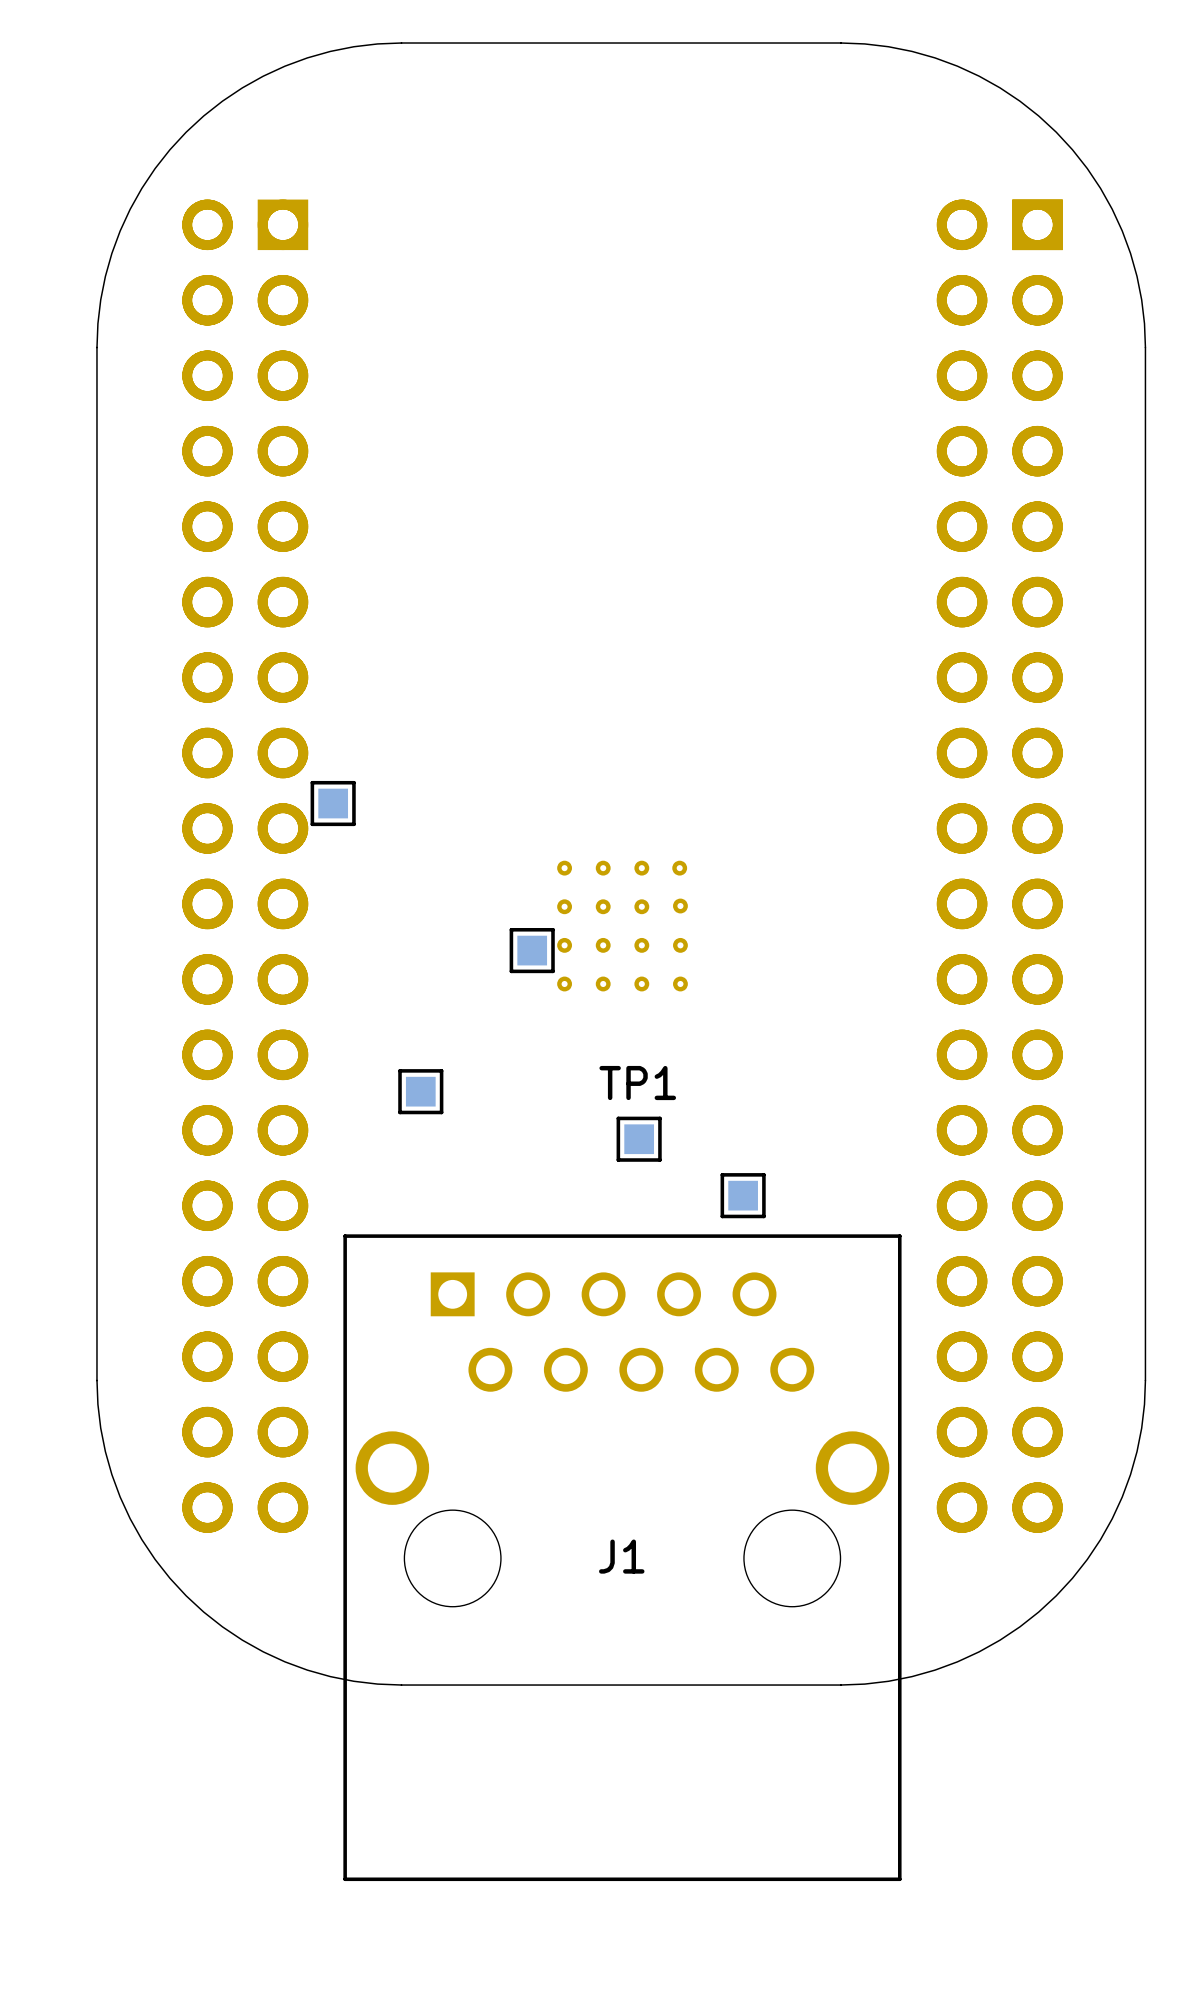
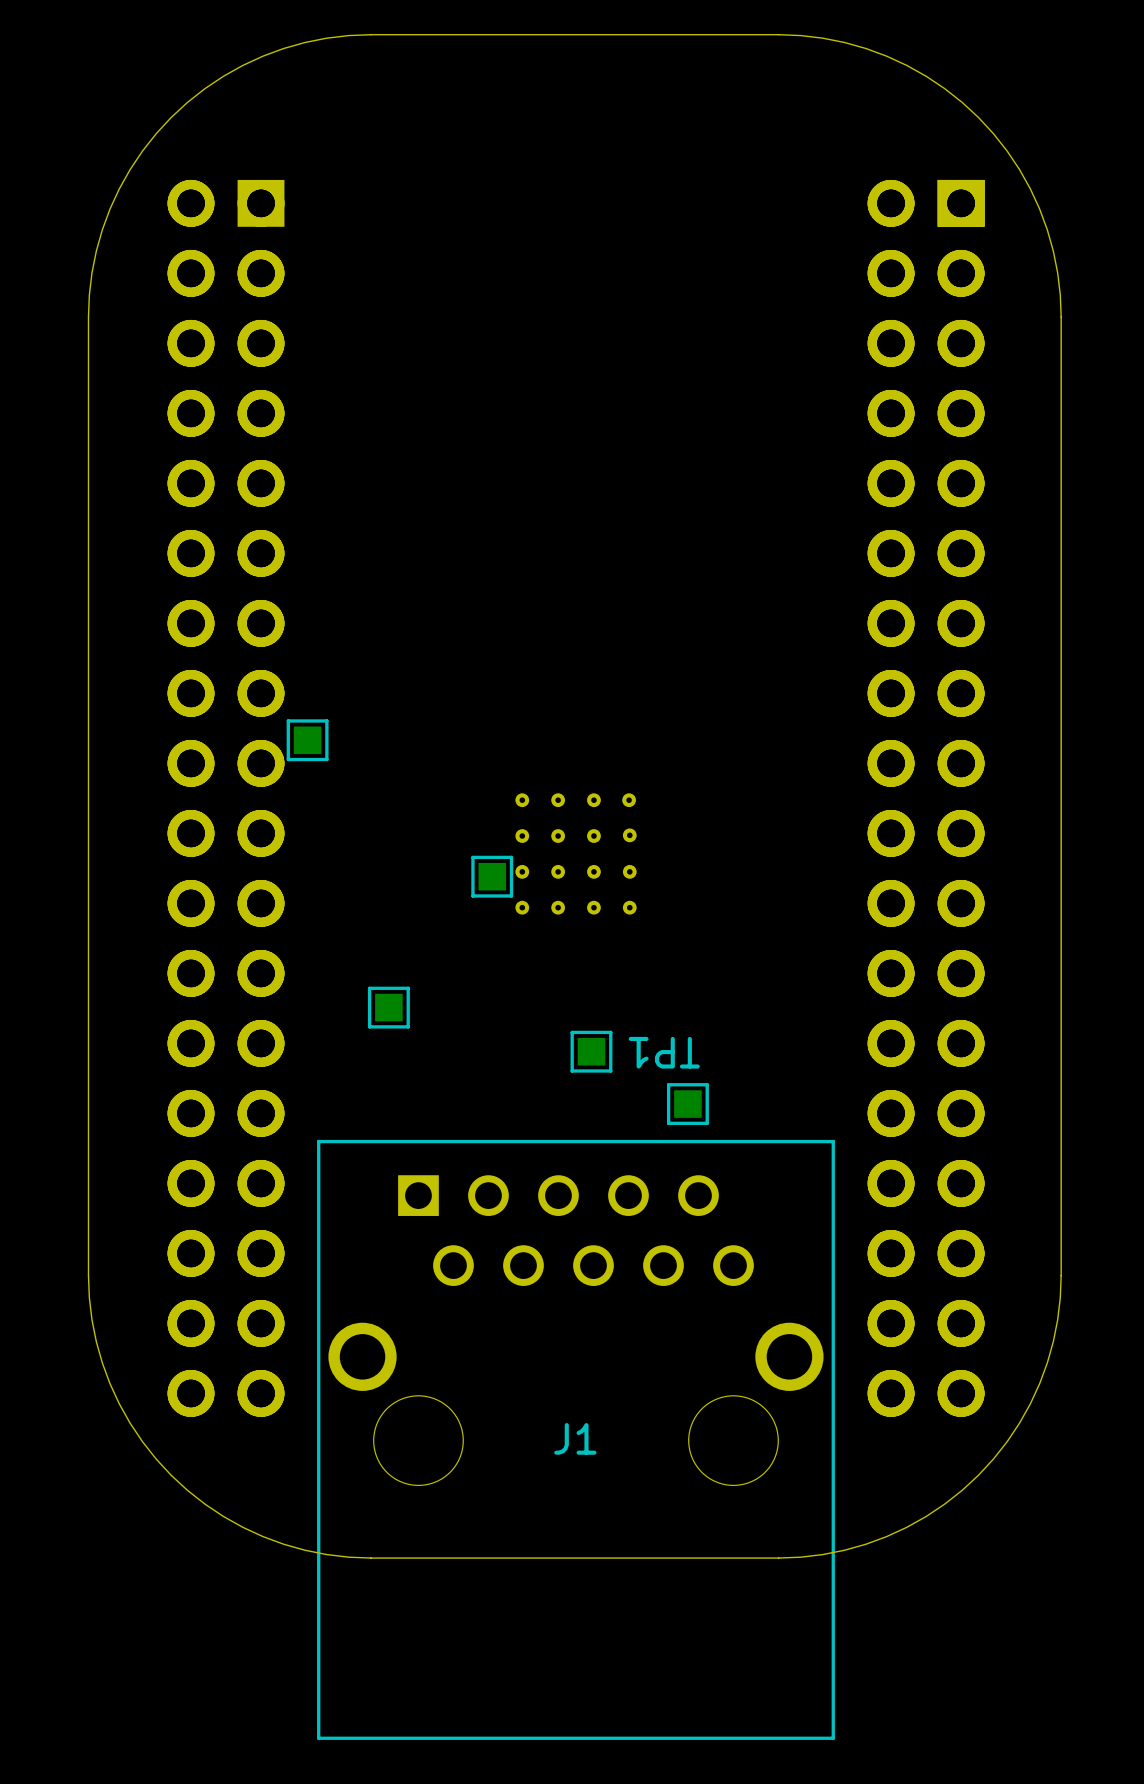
TP1 name rotation: 0° (637, 1083) -> 180° (664, 1052)

